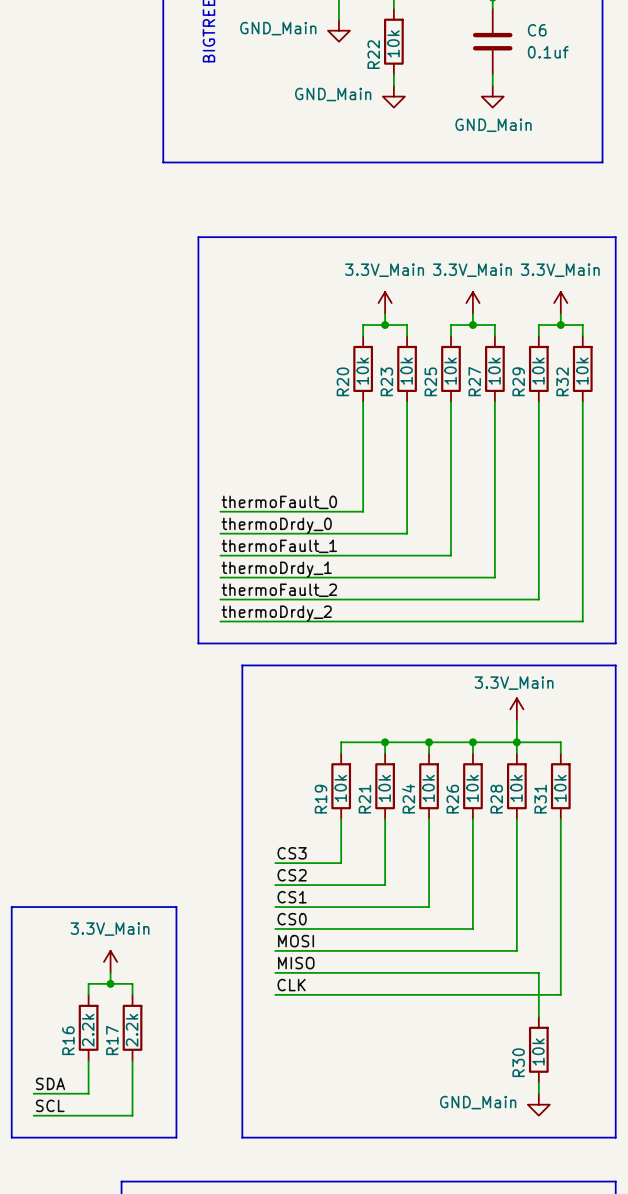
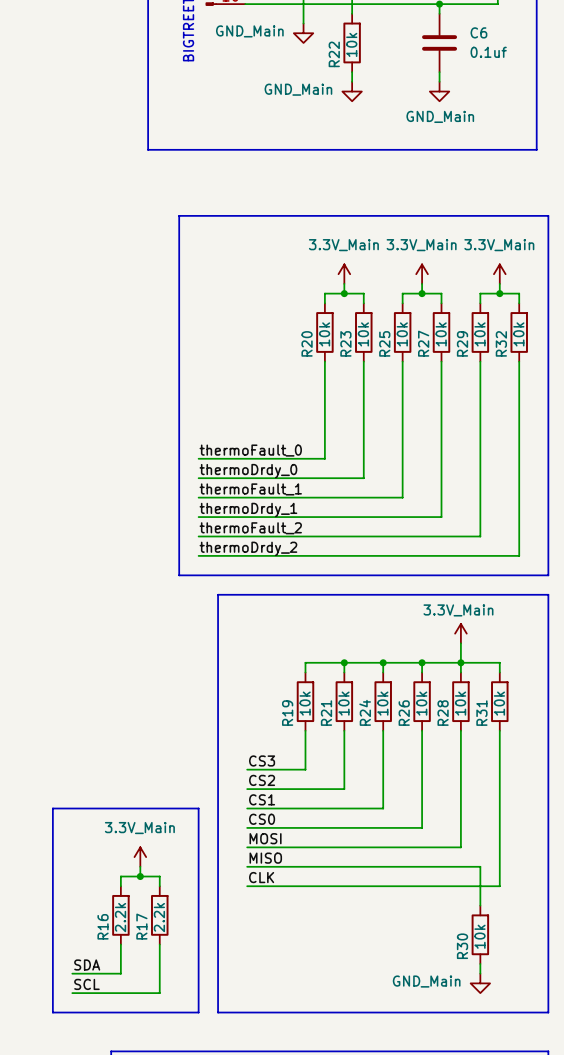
line: (55, 907) (11, 907) (11, 1137) (55, 1137) -> (52, 808) (52, 1012)
line: (176, 907) (176, 1137) -> (159, 808) (198, 808) (198, 1012) (159, 1012)
power symbol position: 3.3V_Main (110, 961) -> 3.3V_Main (140, 857)
wire: (110, 972) (110, 983) -> (140, 866) (140, 876)
junction position: (110, 983) -> (140, 876)
wire: (132, 983) (88, 983) (88, 994) -> (120, 876) (159, 876) (159, 886)
R16: 2.2k (88, 1027) -> none
R17: none -> 2.2k (159, 915)
R17 name: R17 (112, 1040) -> R16 (103, 926)
wire: (88, 1060) (88, 1093) -> none
wire: none -> (159, 944) (159, 993) (120, 993)
label position: SDA (50, 1083) -> SDA (87, 965)
wire: (33, 1093) (77, 1093) -> none
wire: (132, 1093) (132, 1115) -> (120, 973) (82, 973)
label position: SCL (50, 1105) -> SCL (86, 984)
wire: (33, 1115) (77, 1115) -> none

